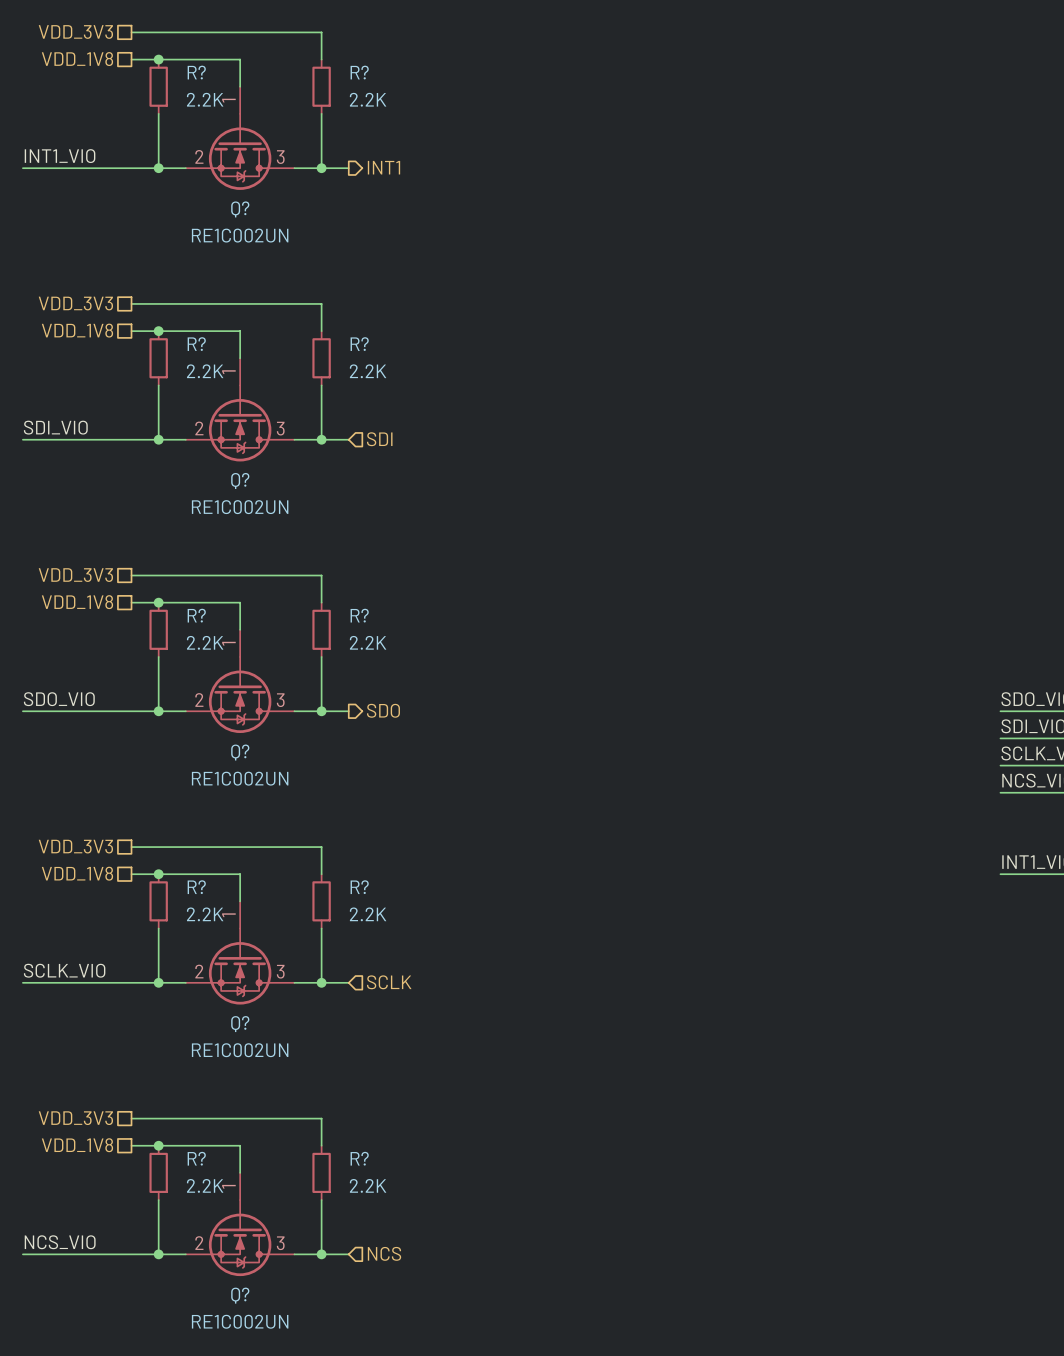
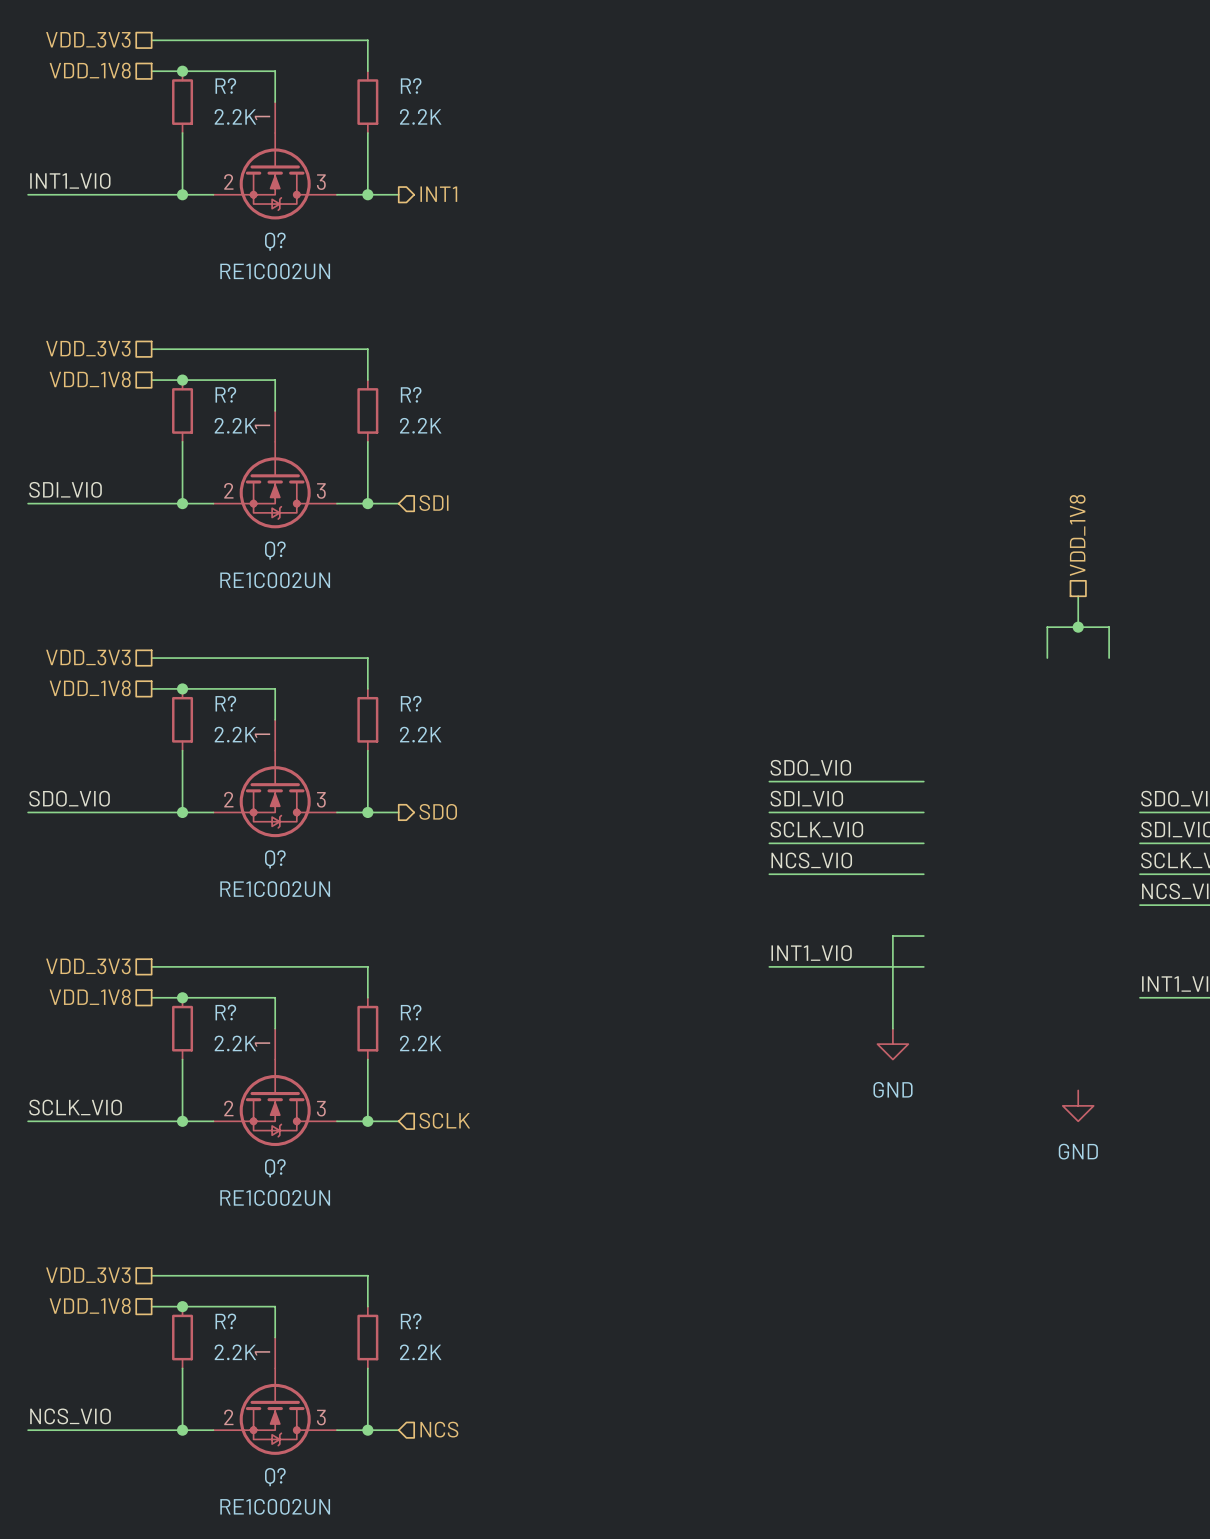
hierarchical label: none -> VDD_1V8 (1077, 535)
wire: none -> (1078, 596) (1078, 627)
junction: none -> (1078, 627)
wire: none -> (1047, 658) (1047, 627) (1109, 627) (1109, 658)
label: none -> SDO_VIO (810, 767)
wire: none -> (769, 781) (923, 781)
label: none -> SDI_VIO (806, 798)
wire: none -> (769, 812) (923, 812)
label: none -> SCLK_VIO (816, 829)
wire: none -> (769, 843) (923, 843)
label: none -> NCS_VIO (811, 860)
wire: none -> (769, 874) (923, 874)
wire: none -> (923, 936) (892, 936) (892, 1028)
label: none -> INT1_VIO (811, 953)
wire: none -> (769, 966) (923, 966)
power symbol: none -> GND (892, 1044)
power symbol: none -> GND (1078, 1105)

